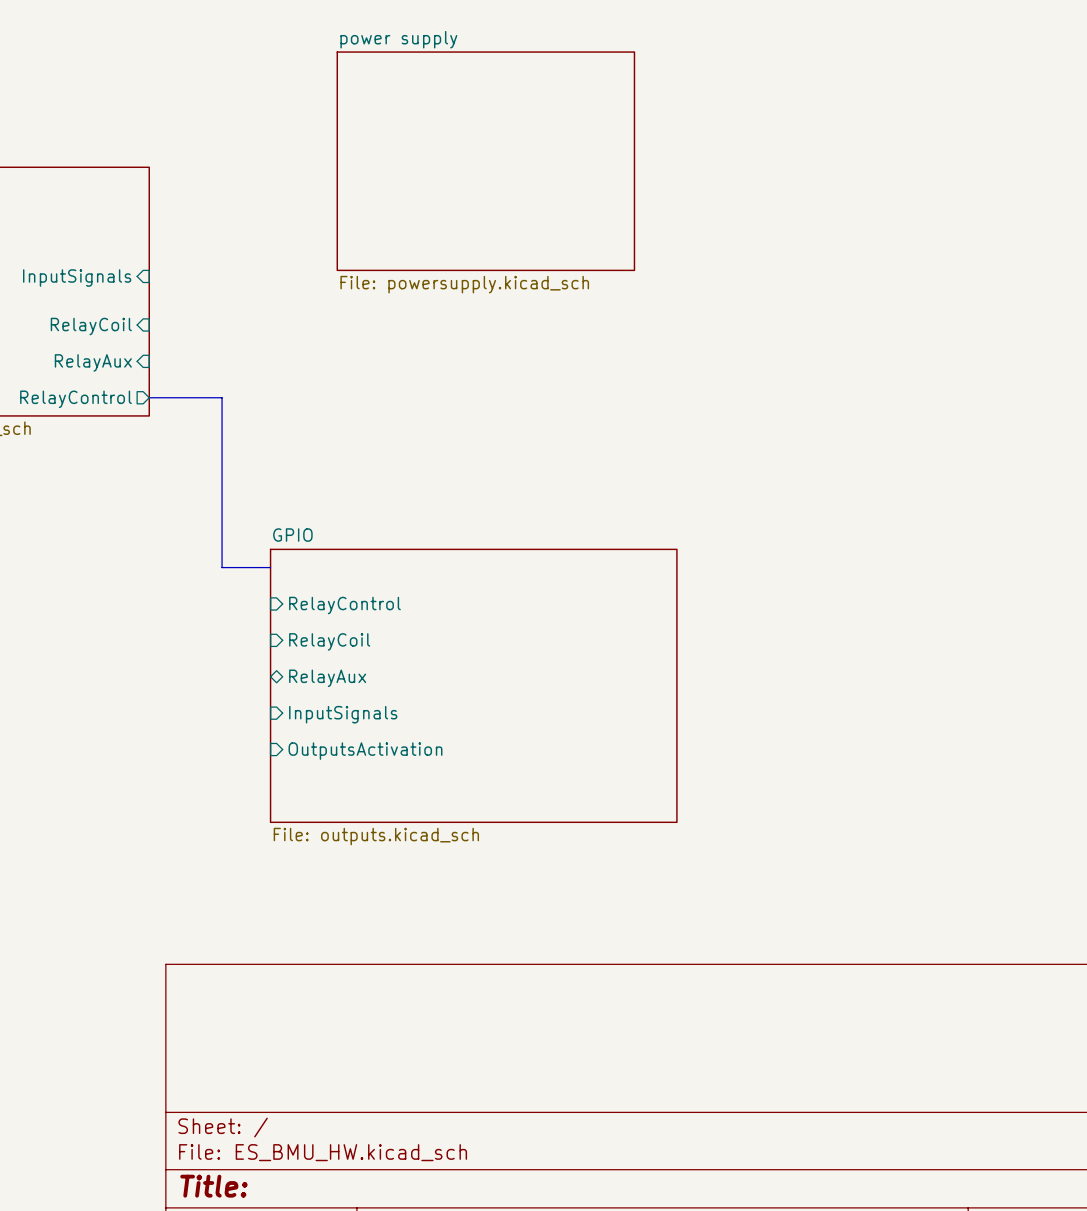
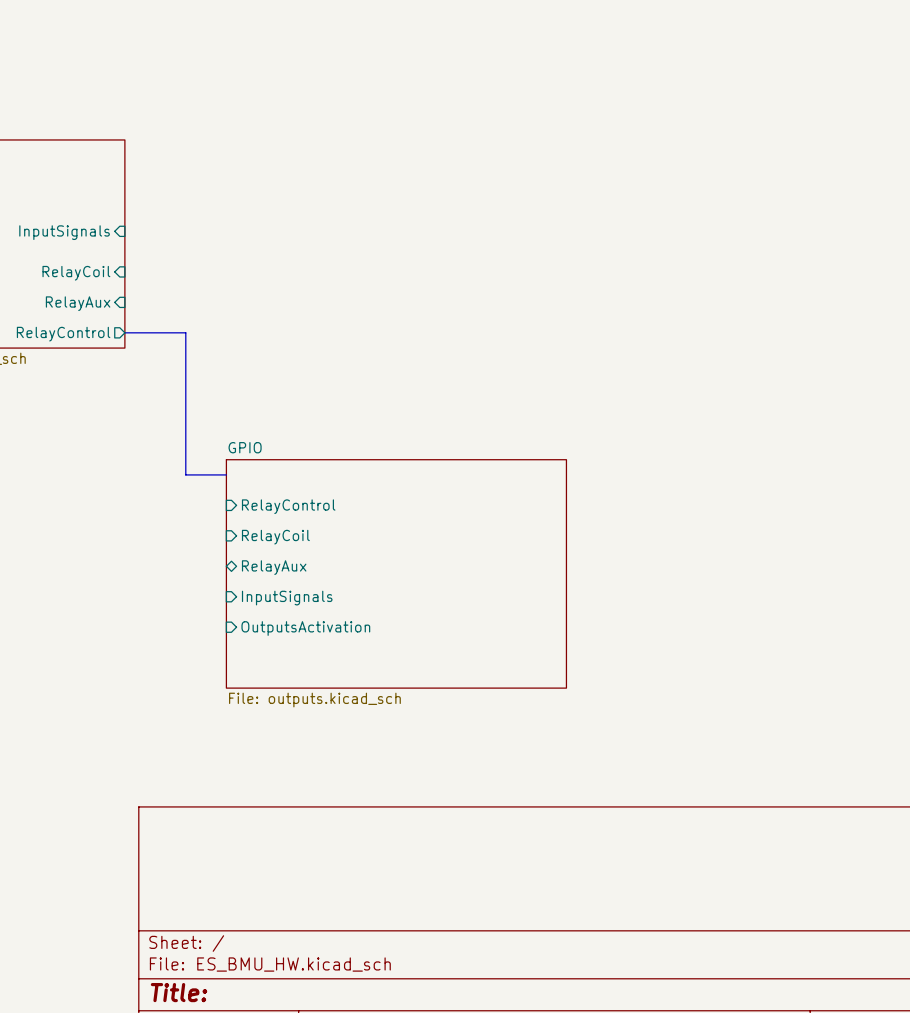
sheet power supply: File: powersupply.kicad_sch (485, 161) -> none

